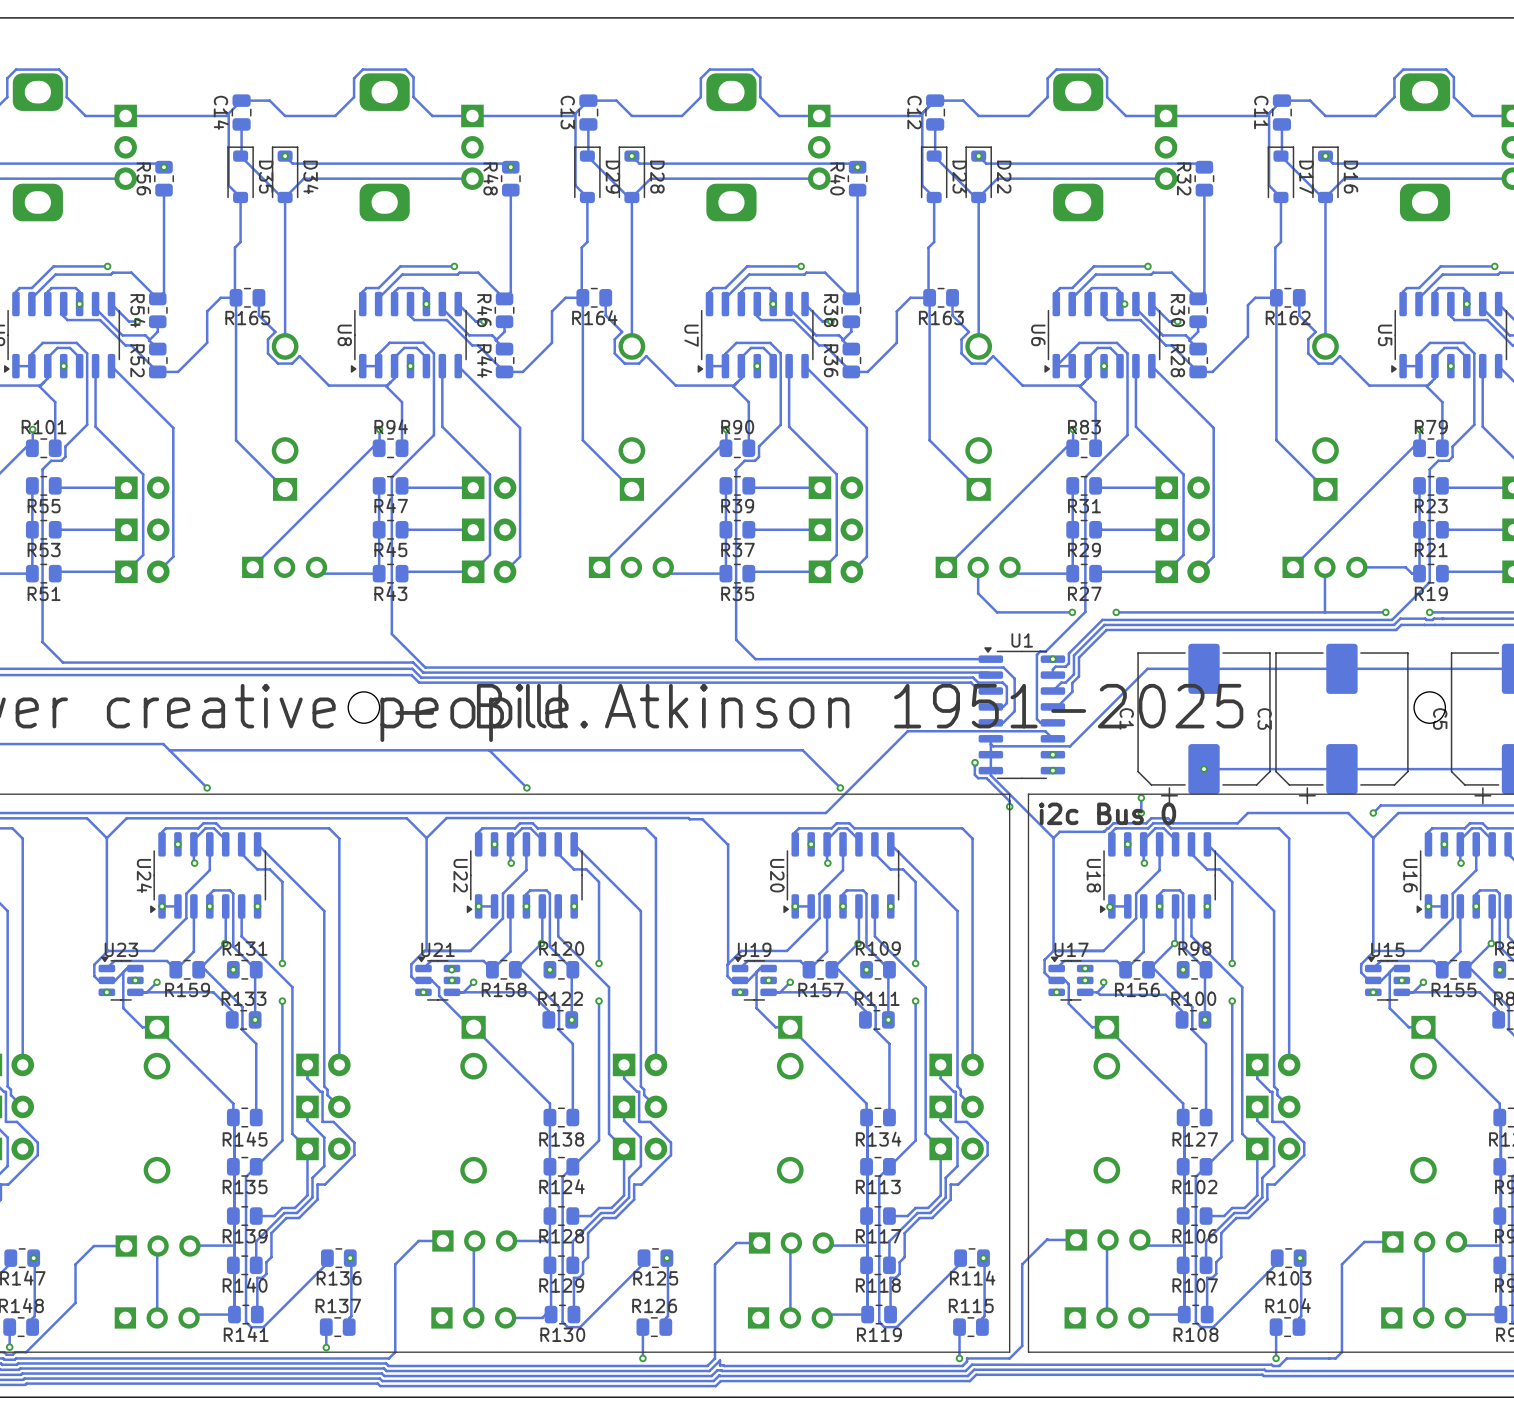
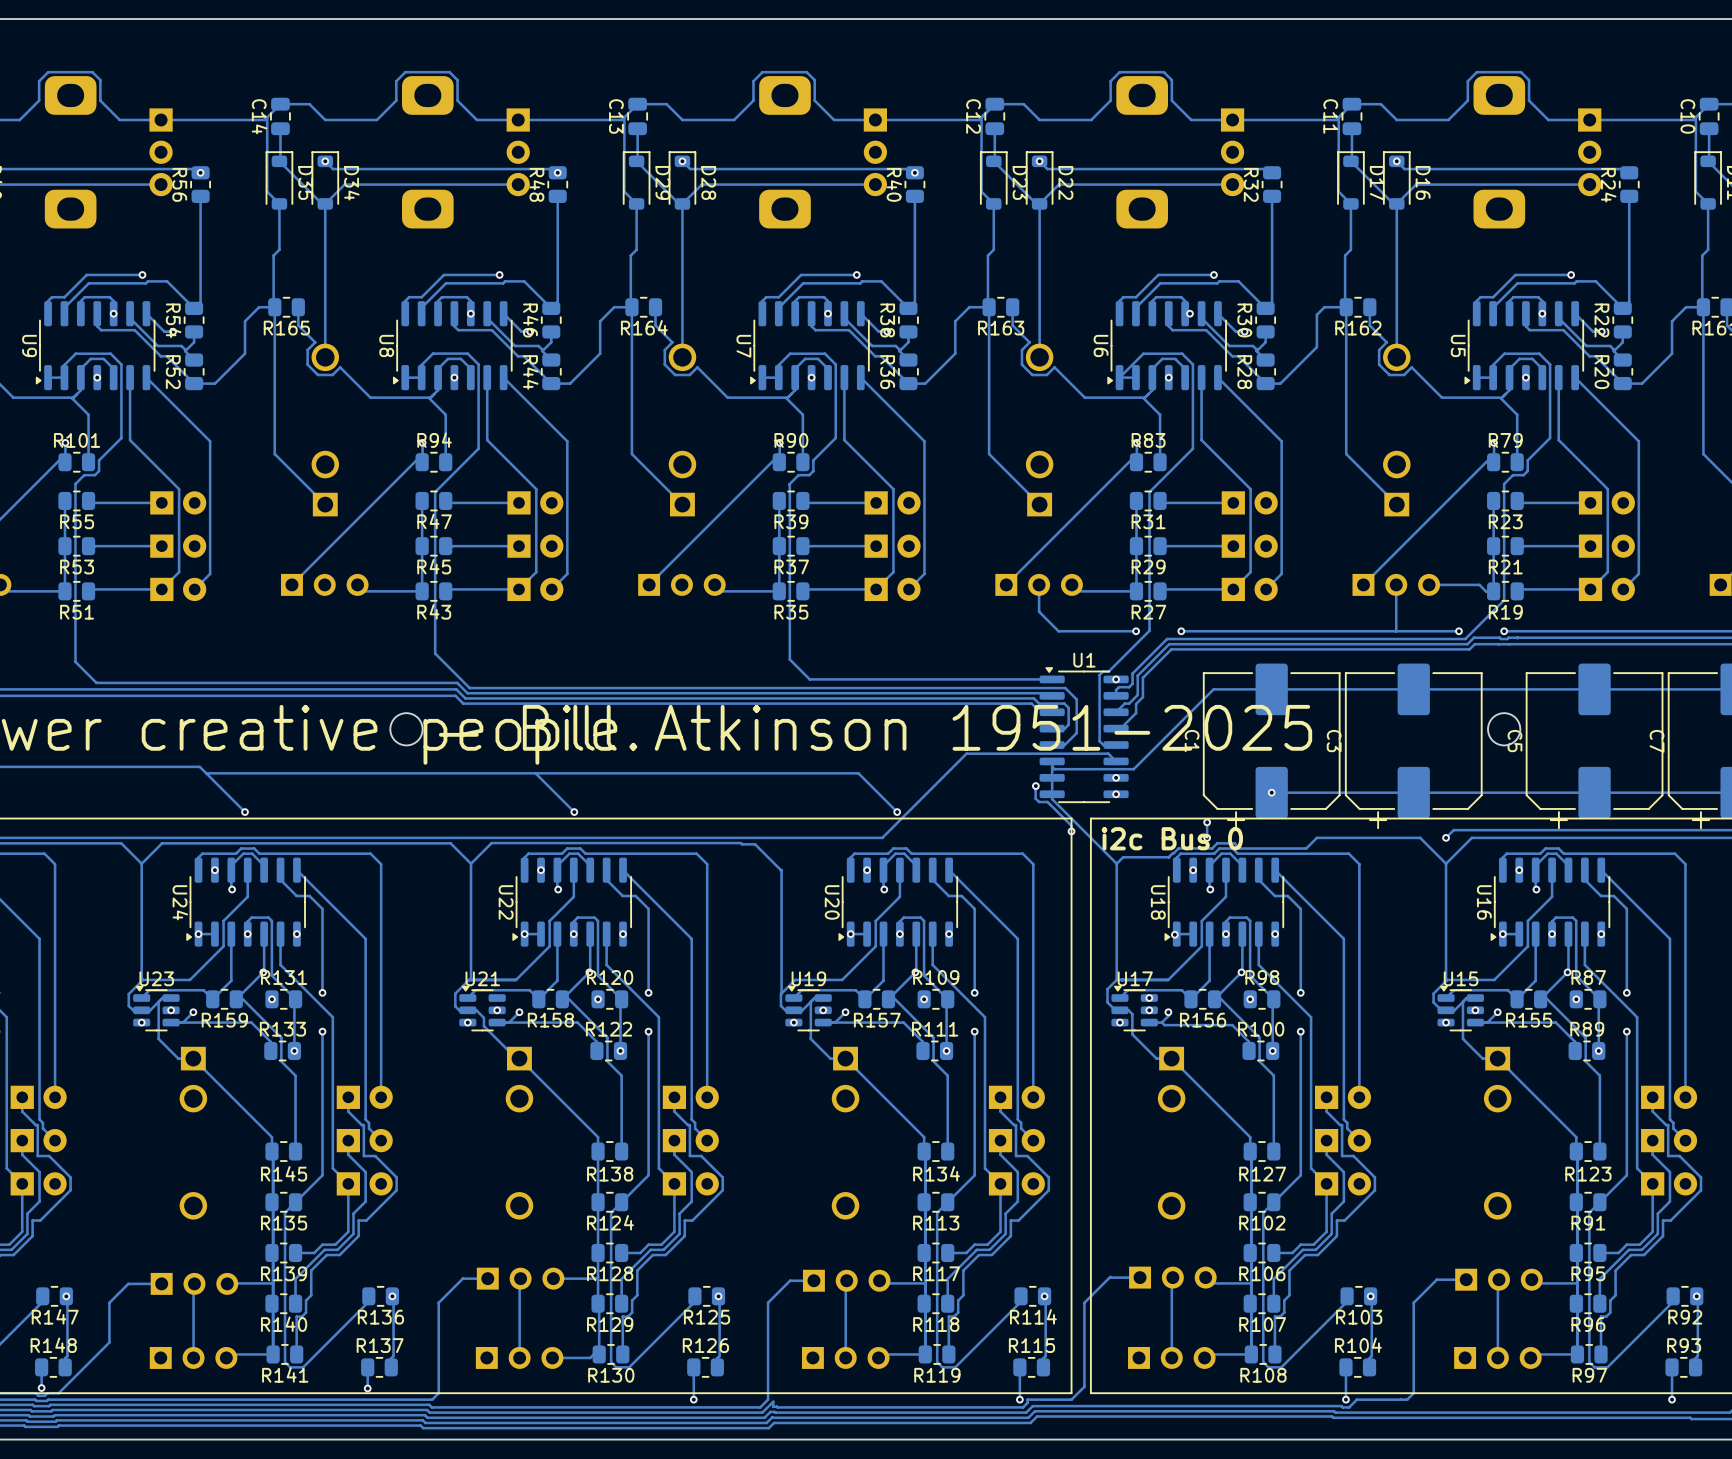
via: (451, 969) -> none

